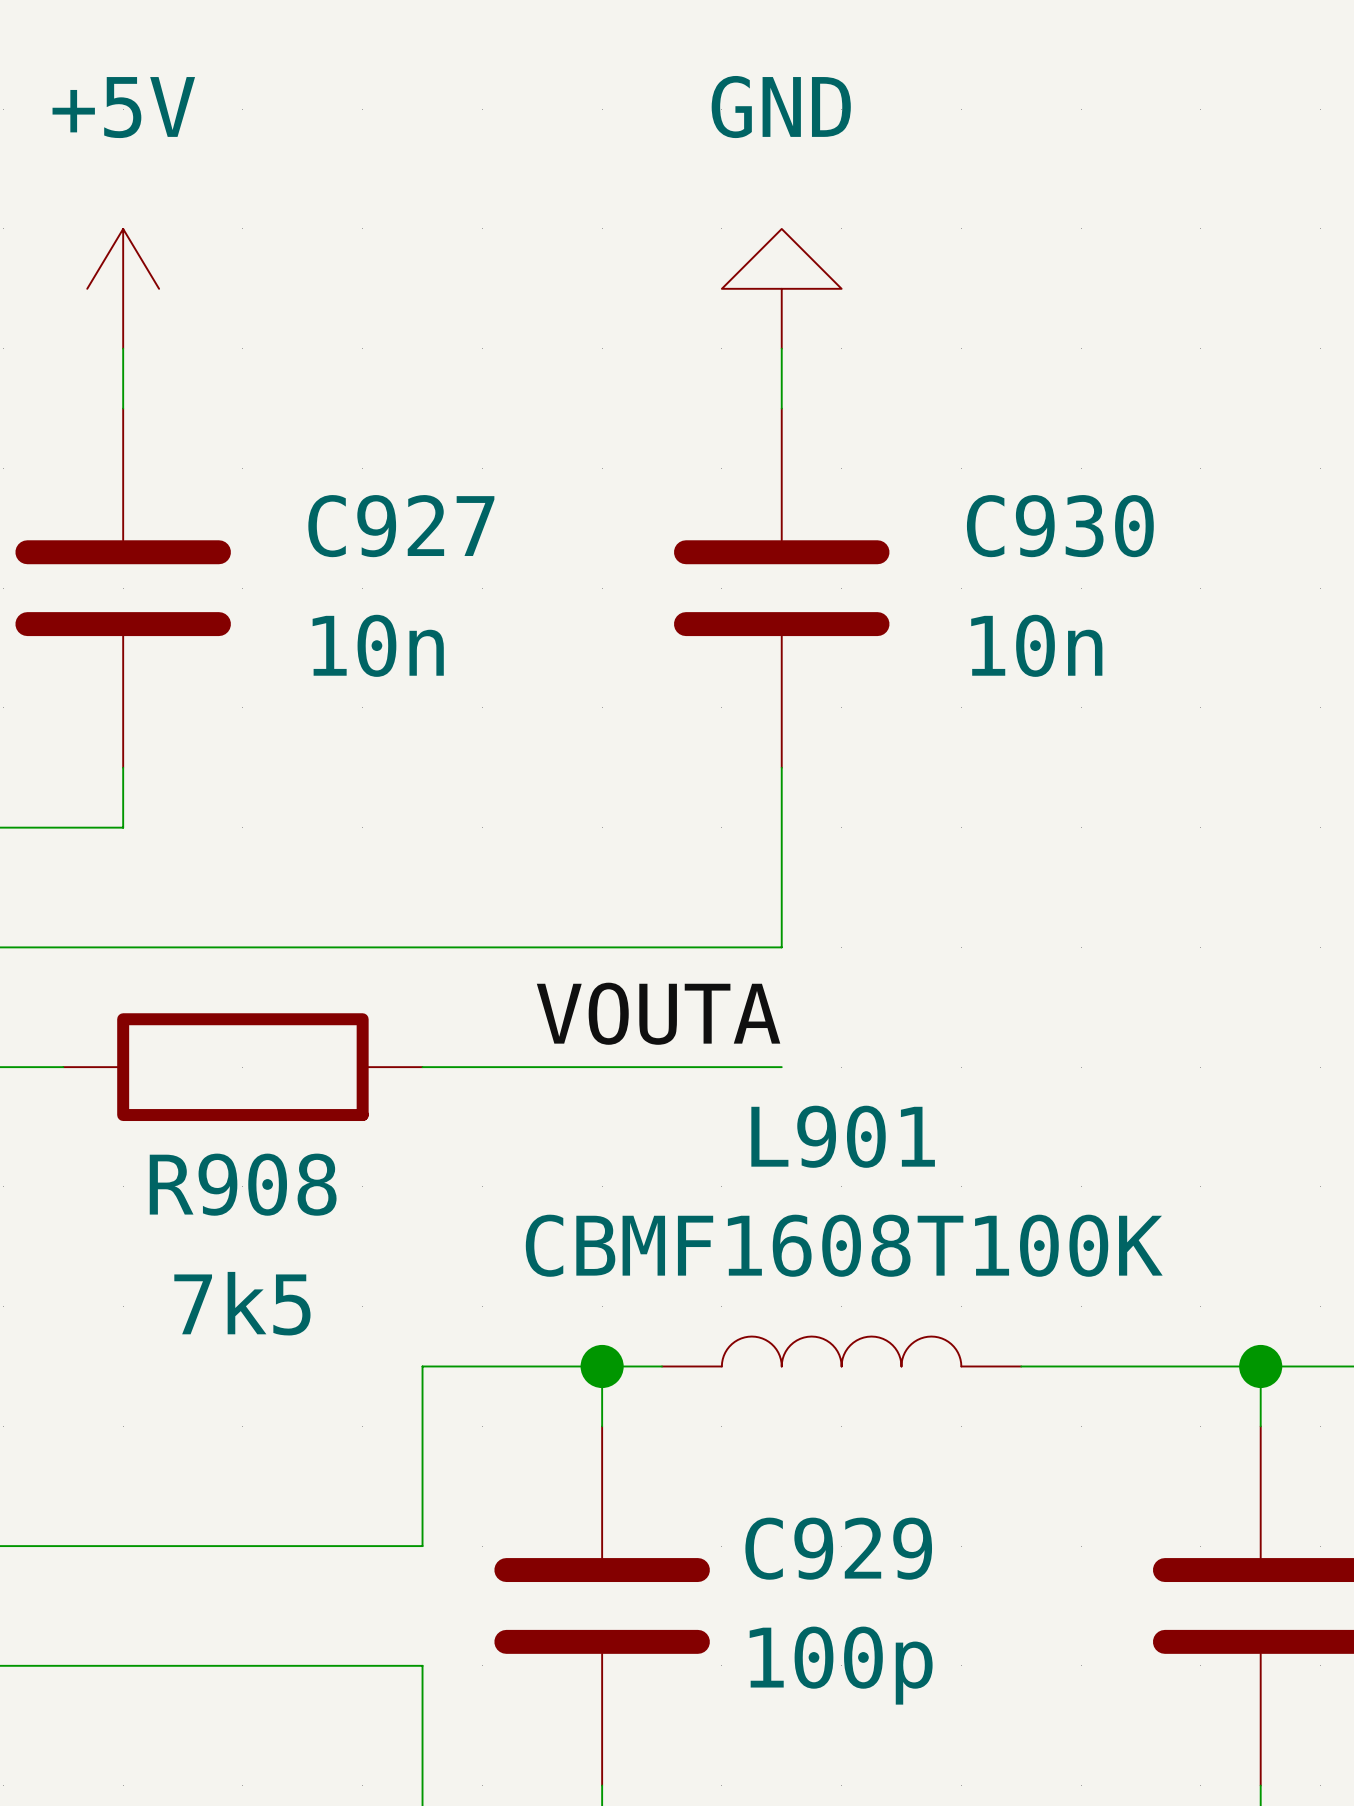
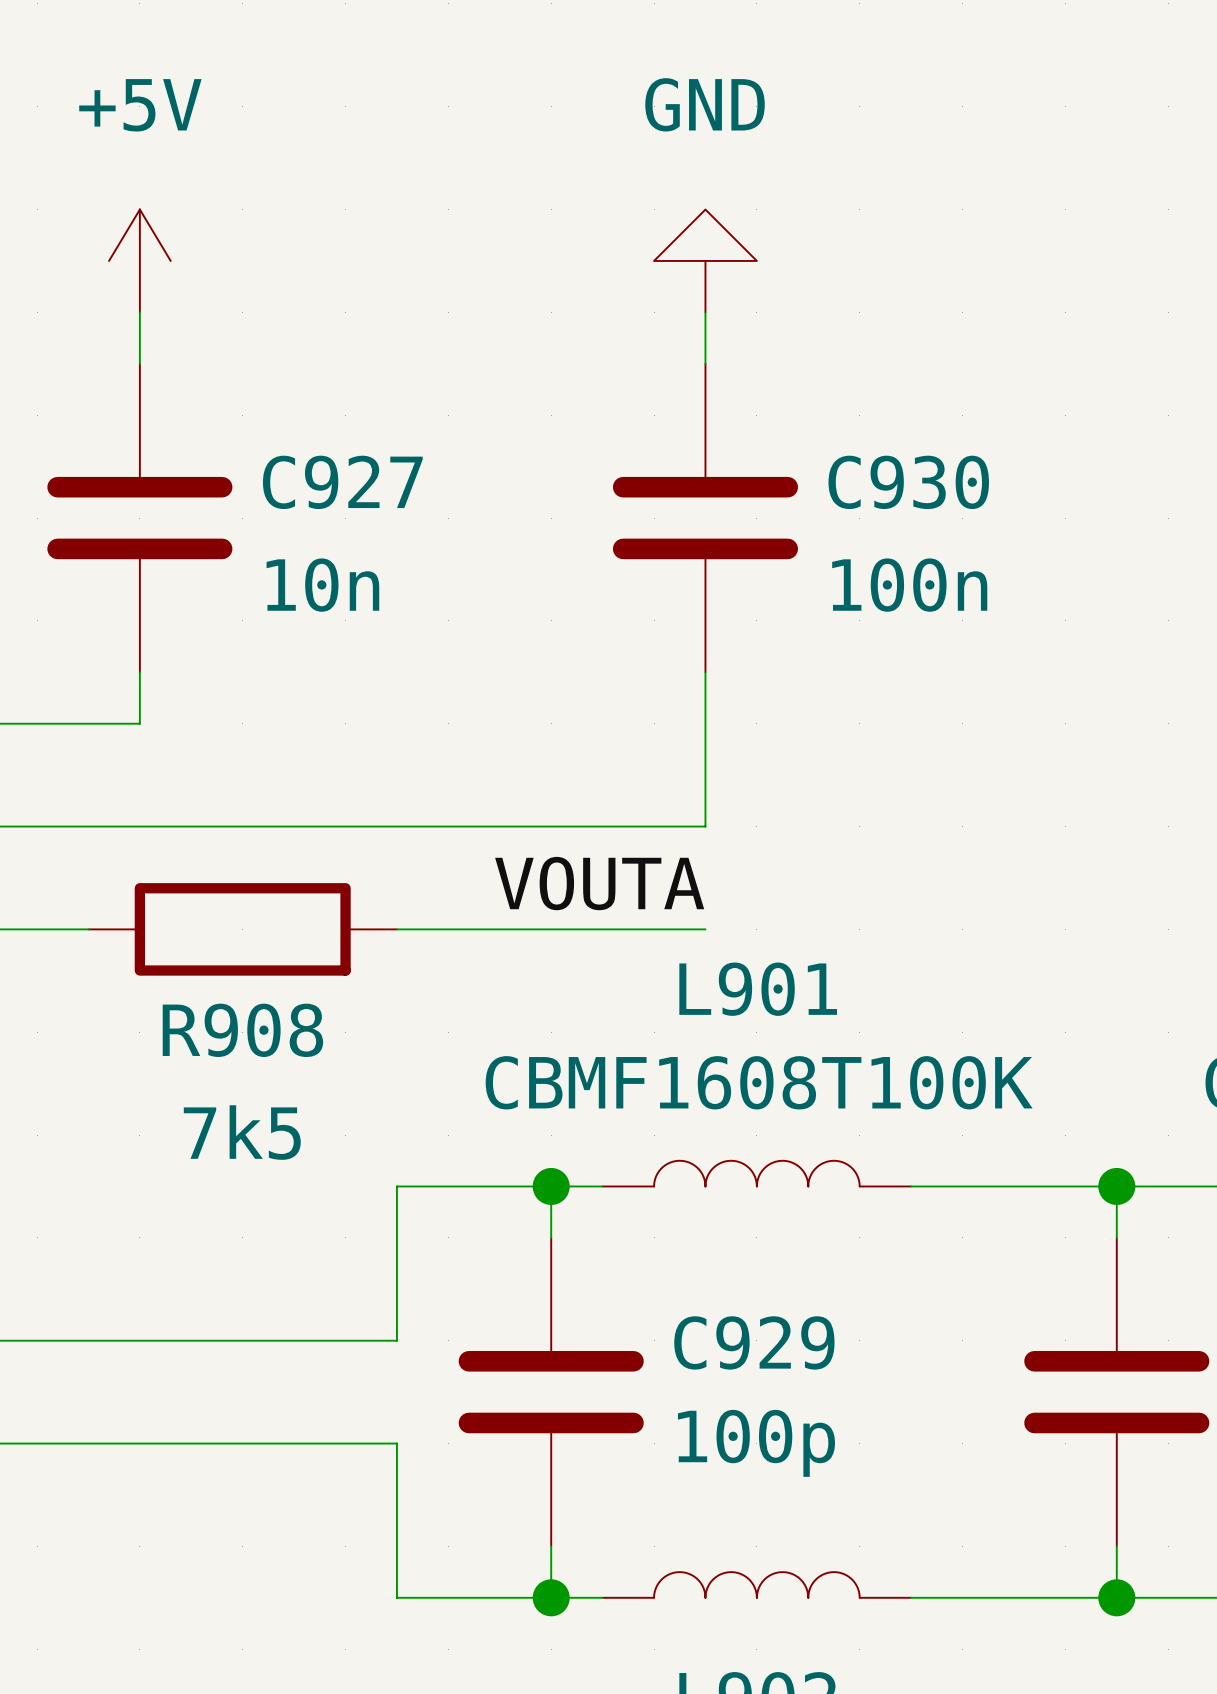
C927 name position: C927 (401, 526) -> C927 (342, 482)
C930 name position: C930 (1060, 526) -> C930 (908, 482)
C927 value position: 10n (378, 645) -> 10n (322, 585)
C930 value: 10n (1036, 645) -> 100n (909, 585)

